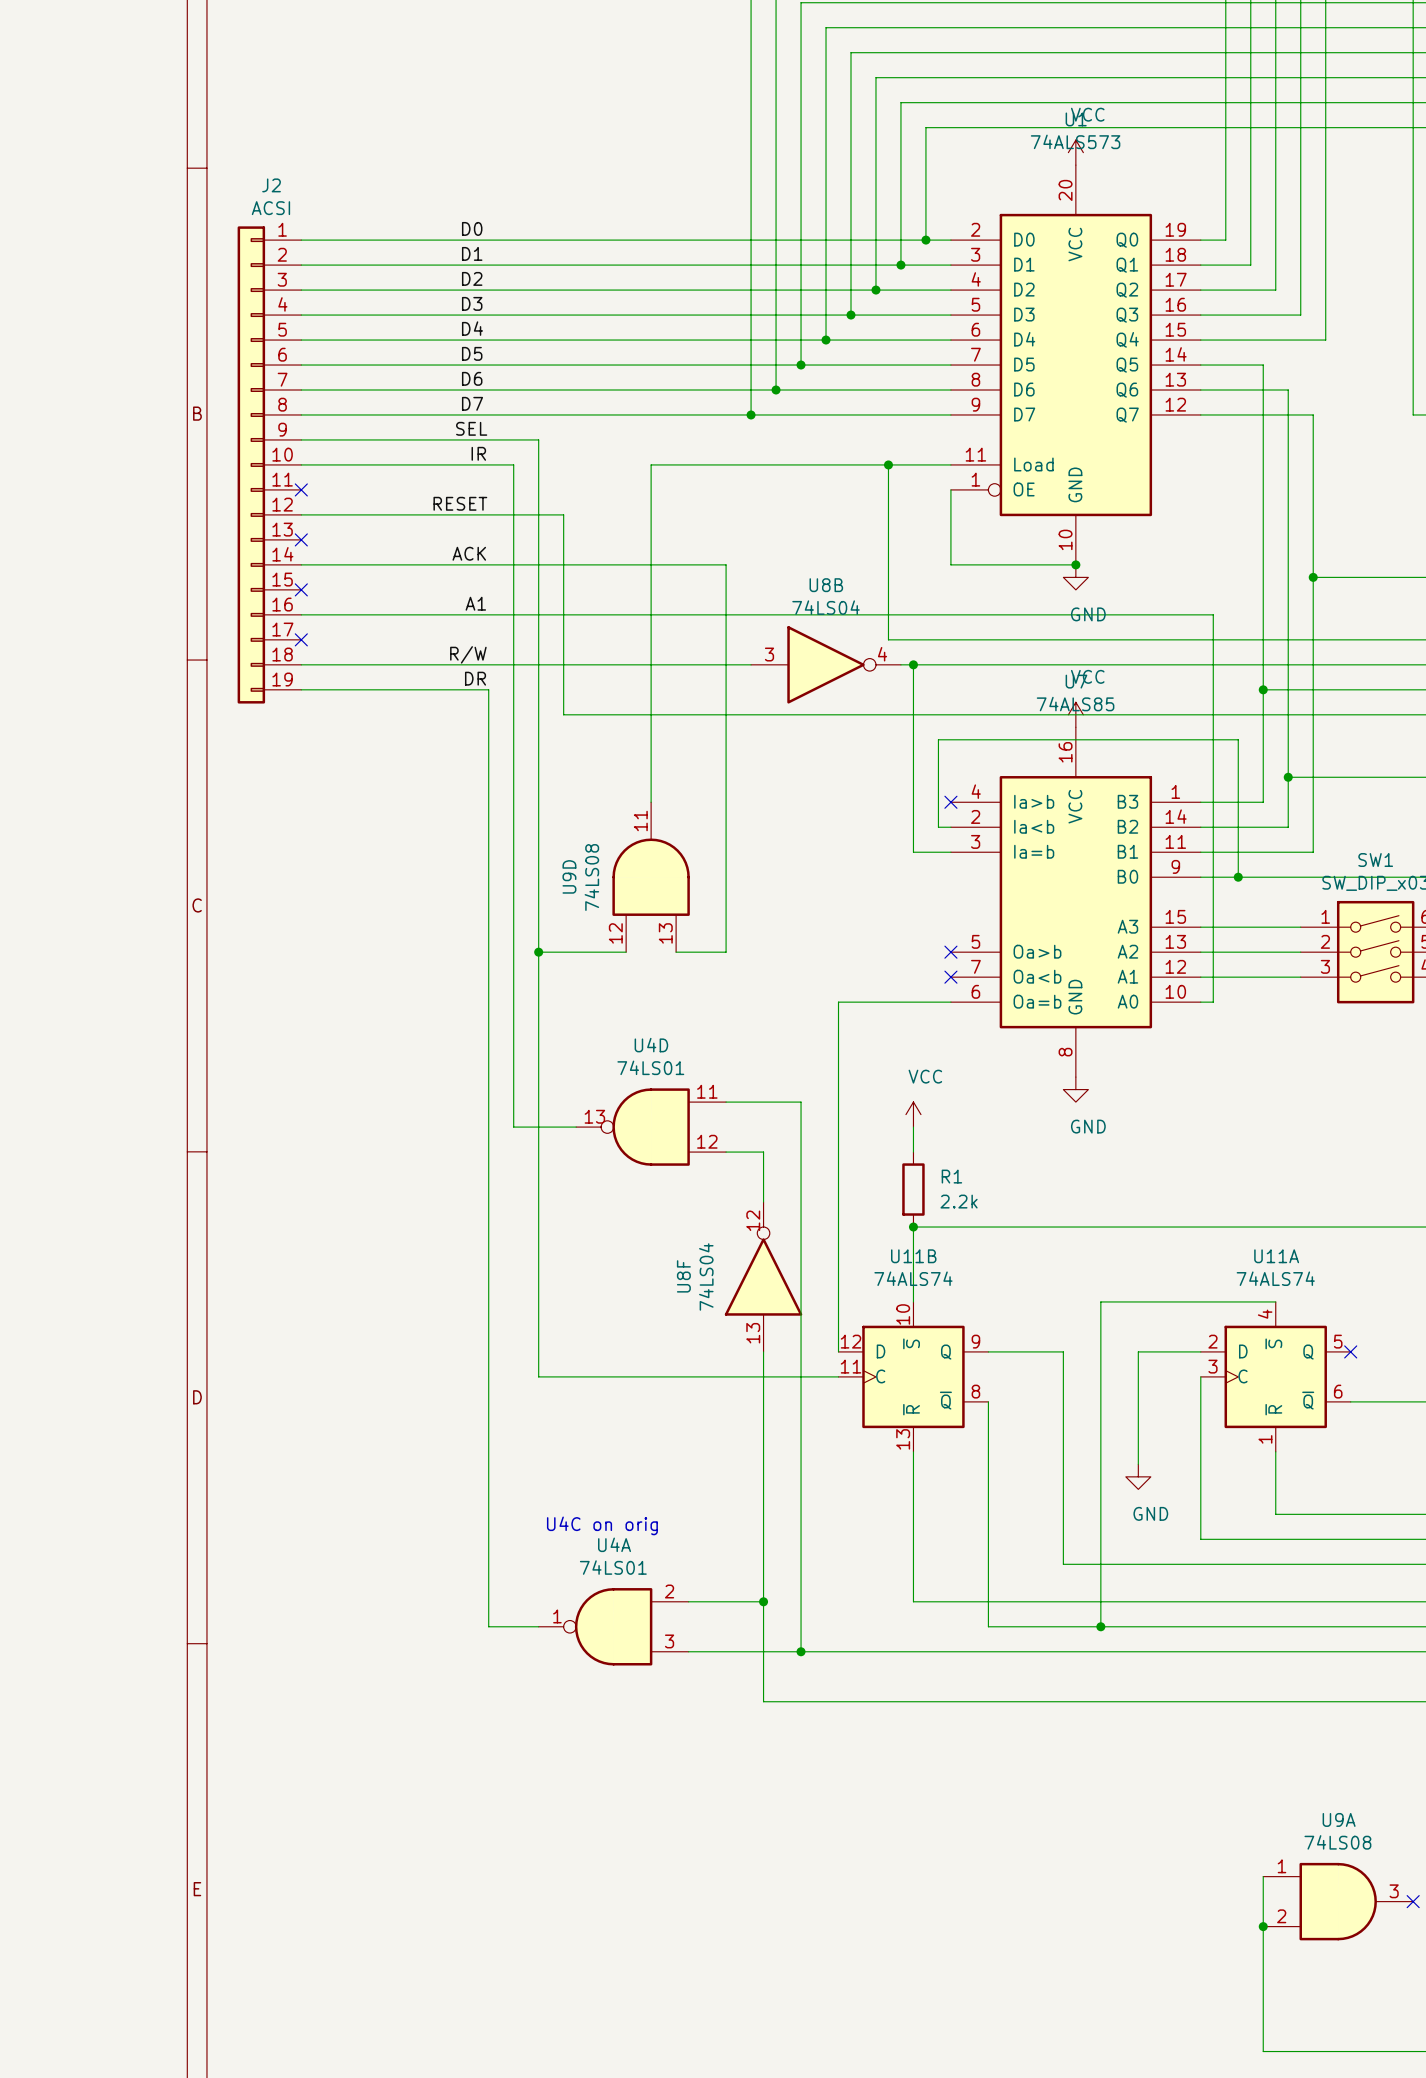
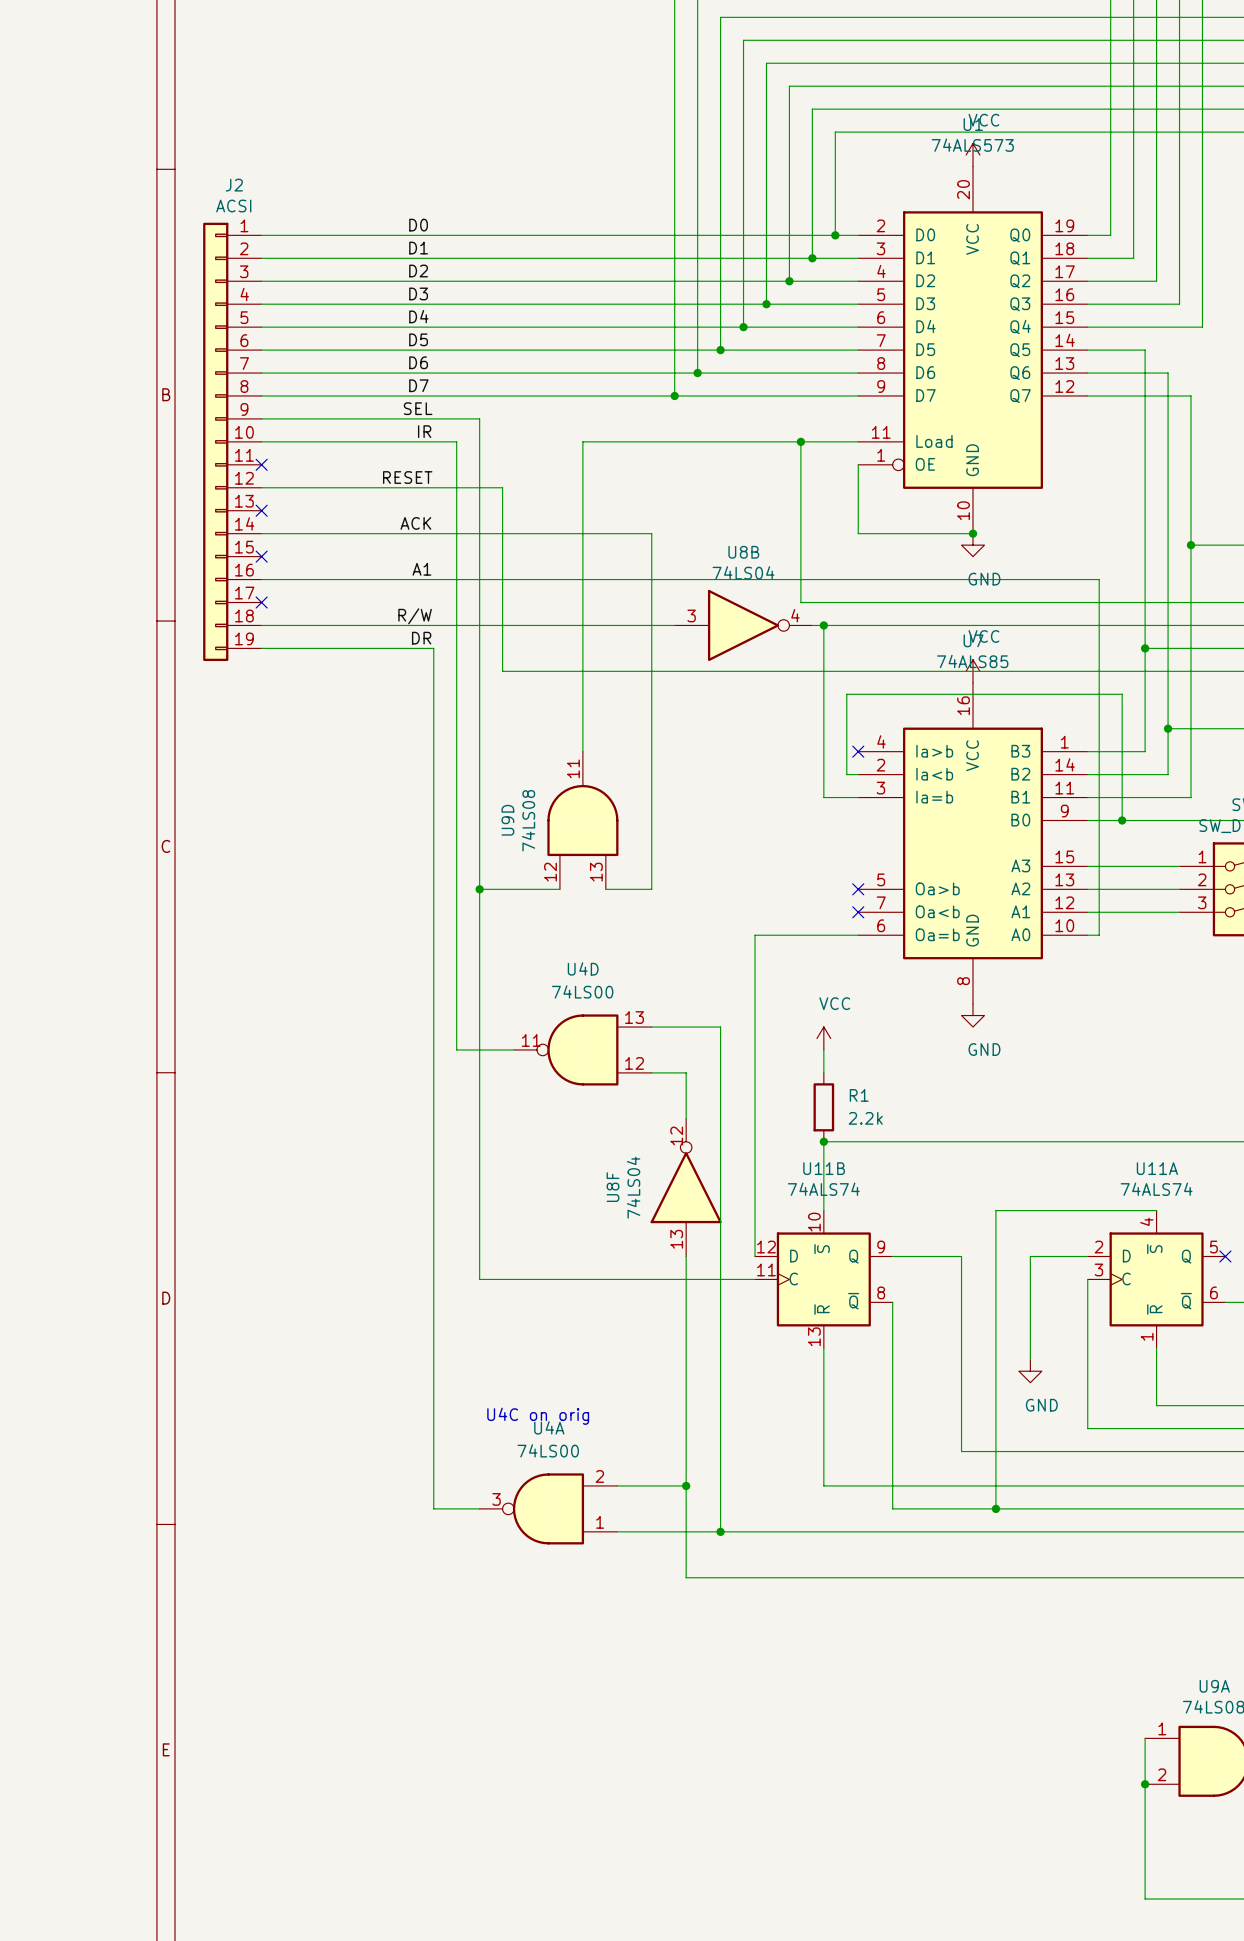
U4D value: 74LS01 (650, 1067) -> 74LS00 (582, 991)
U4D symbol: [576, 1088, 727, 1166] -> [514, 1014, 652, 1086]
U4A value: 74LS01 (613, 1567) -> 74LS00 (548, 1450)
U4A symbol: [538, 1588, 689, 1666] -> [479, 1473, 618, 1545]

